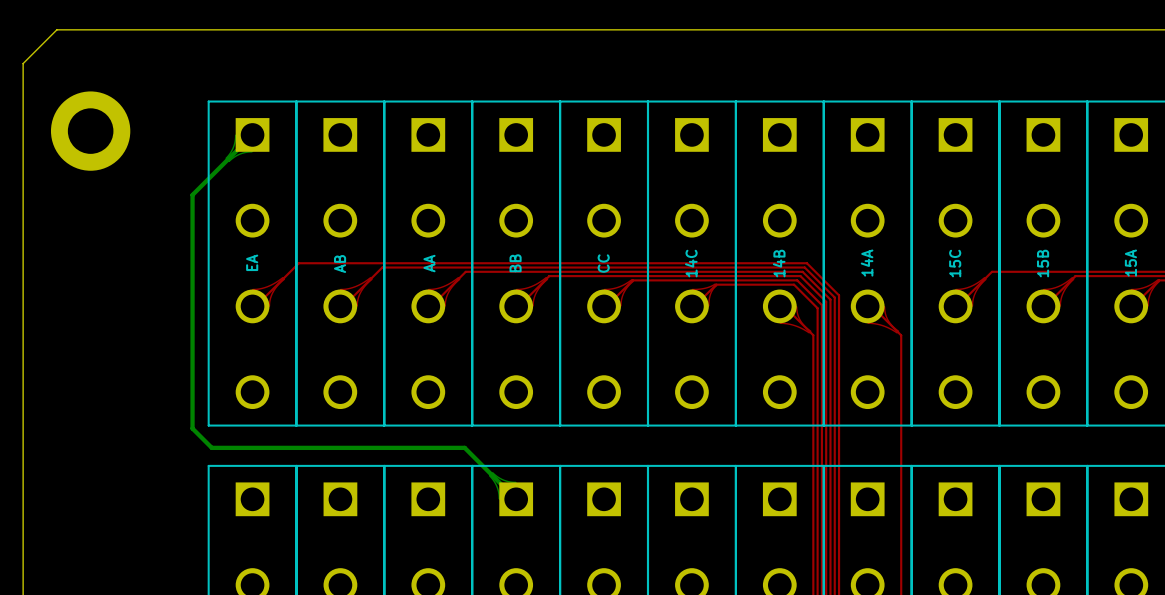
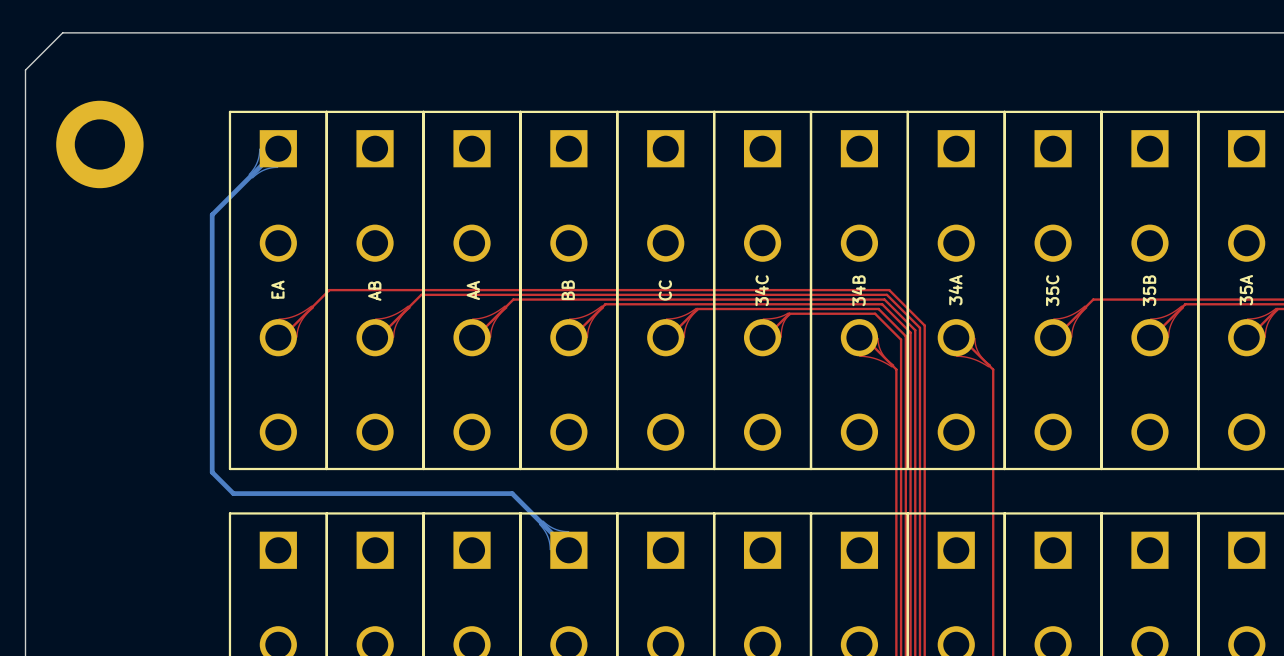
text: 14C (691, 263) -> 34C (761, 290)
text: 14B (779, 263) -> 34B (858, 290)
text: 14A (867, 263) -> 34A (955, 290)
text: 15C (955, 263) -> 35C (1052, 290)
text: 15B (1043, 263) -> 35B (1149, 290)
text: 15A (1130, 263) -> 35A (1246, 290)

